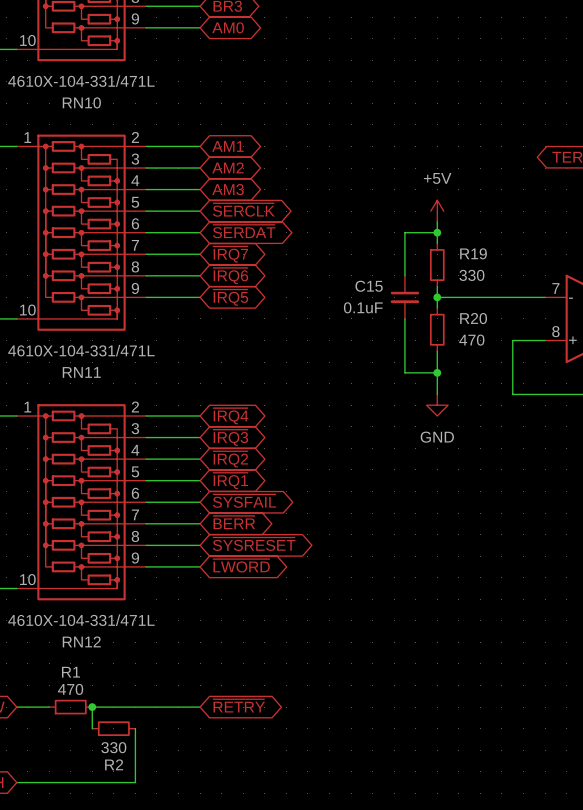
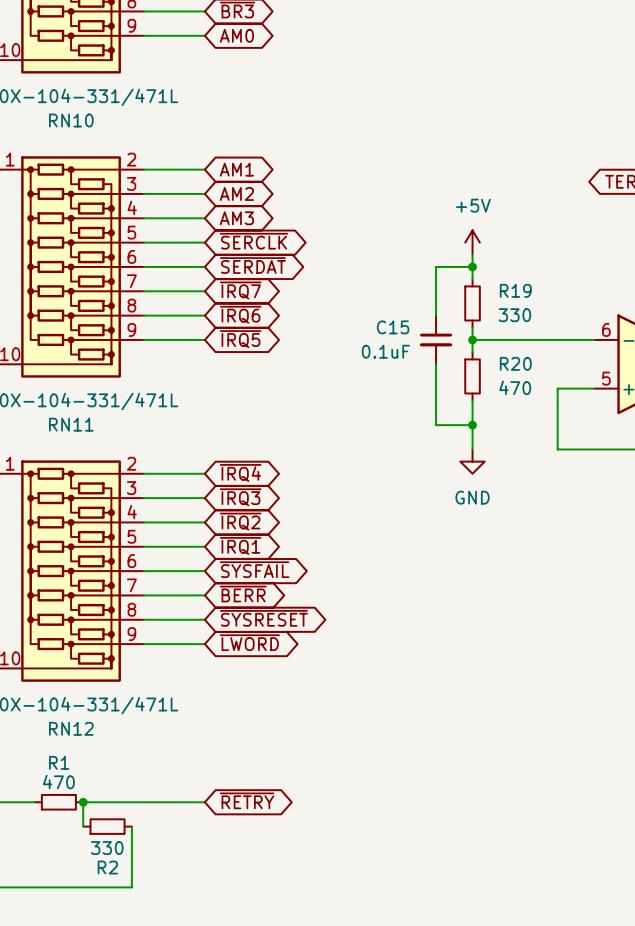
part pin number: 7 (555, 288) -> 6 (606, 329)
part pin number: 8 (555, 331) -> 5 (606, 378)

